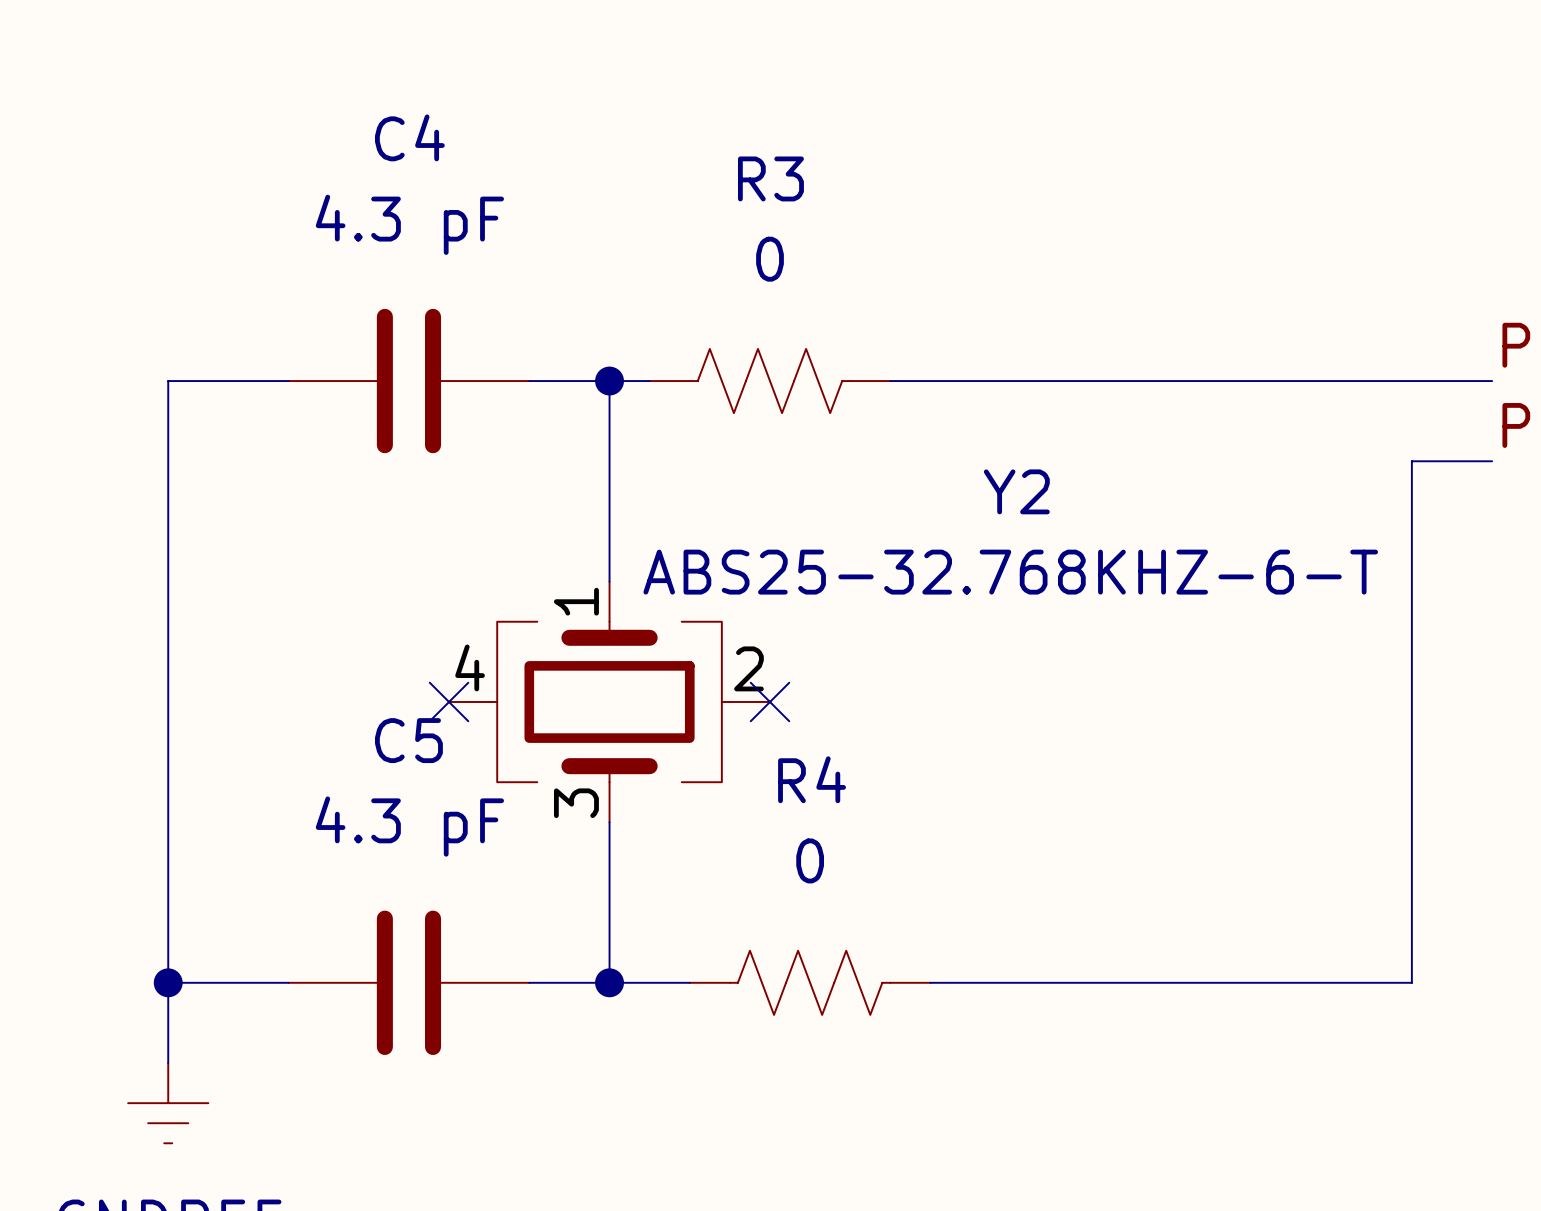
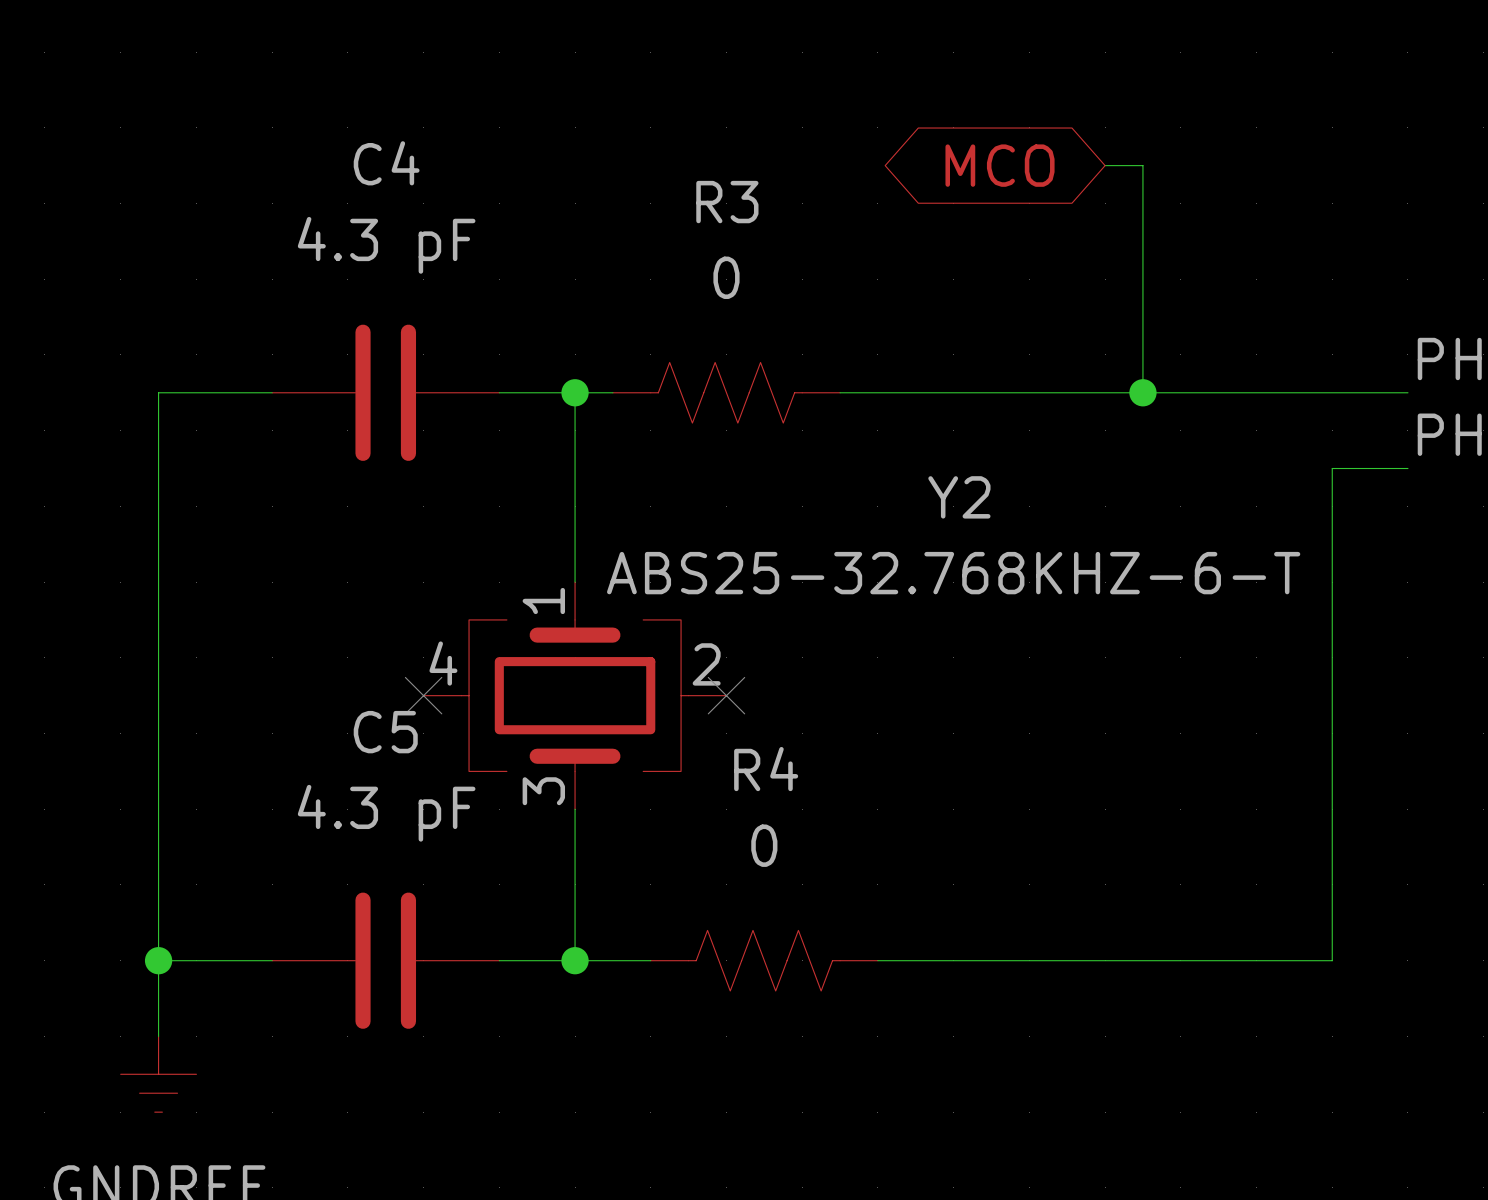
global label: none -> MCO (1000, 165)
wire: none -> (1105, 165) (1142, 165) (1142, 392)
junction: none -> (1142, 392)

